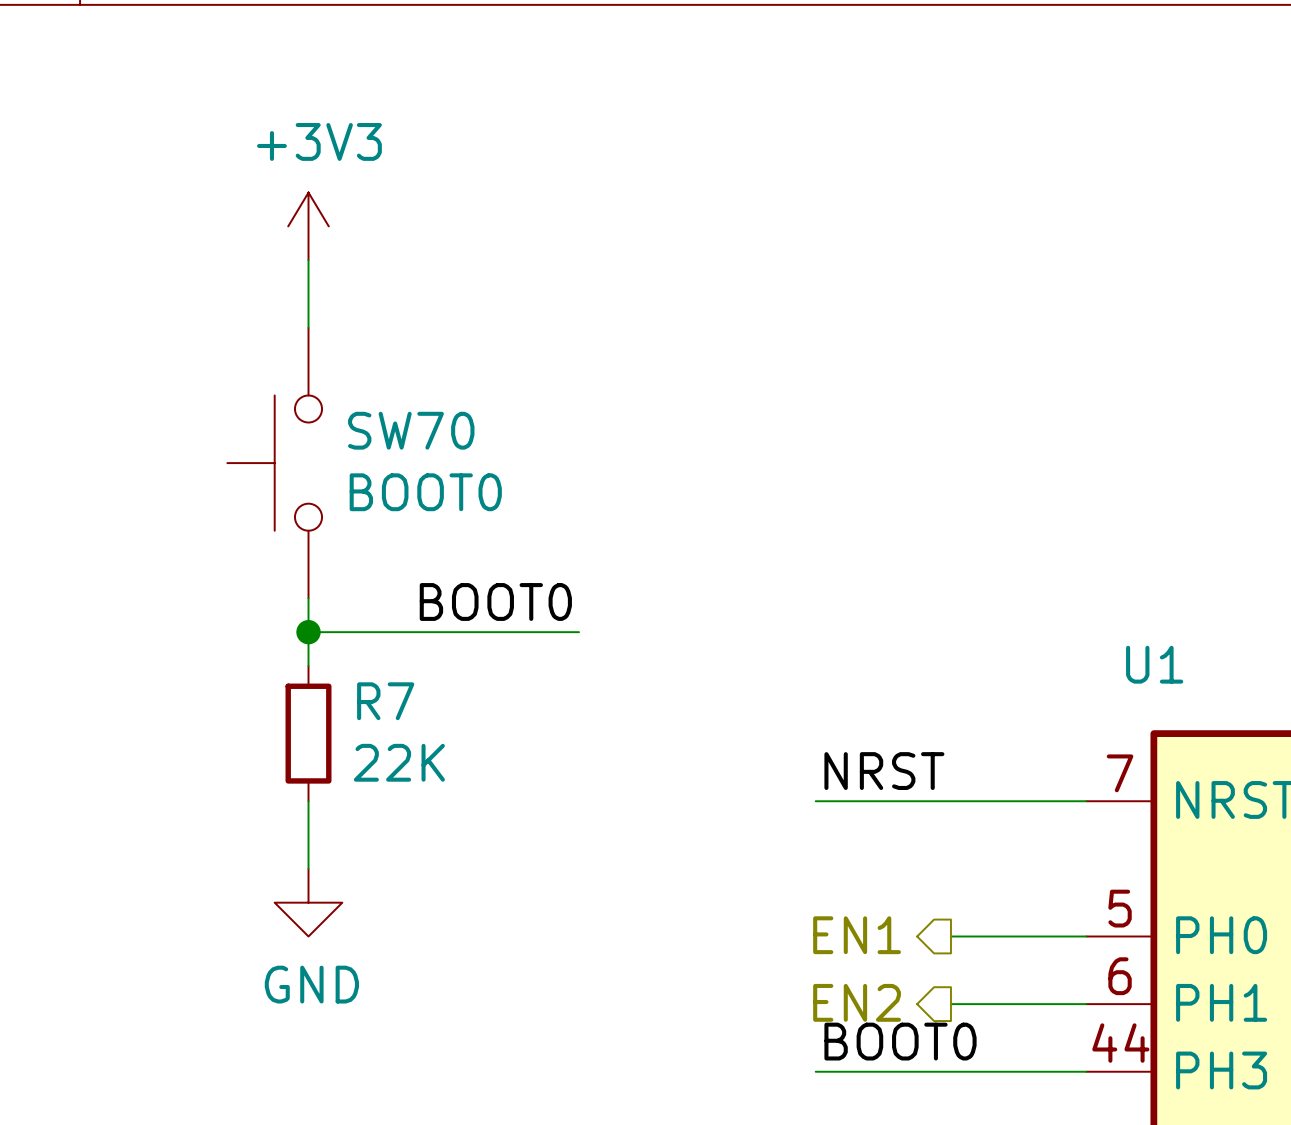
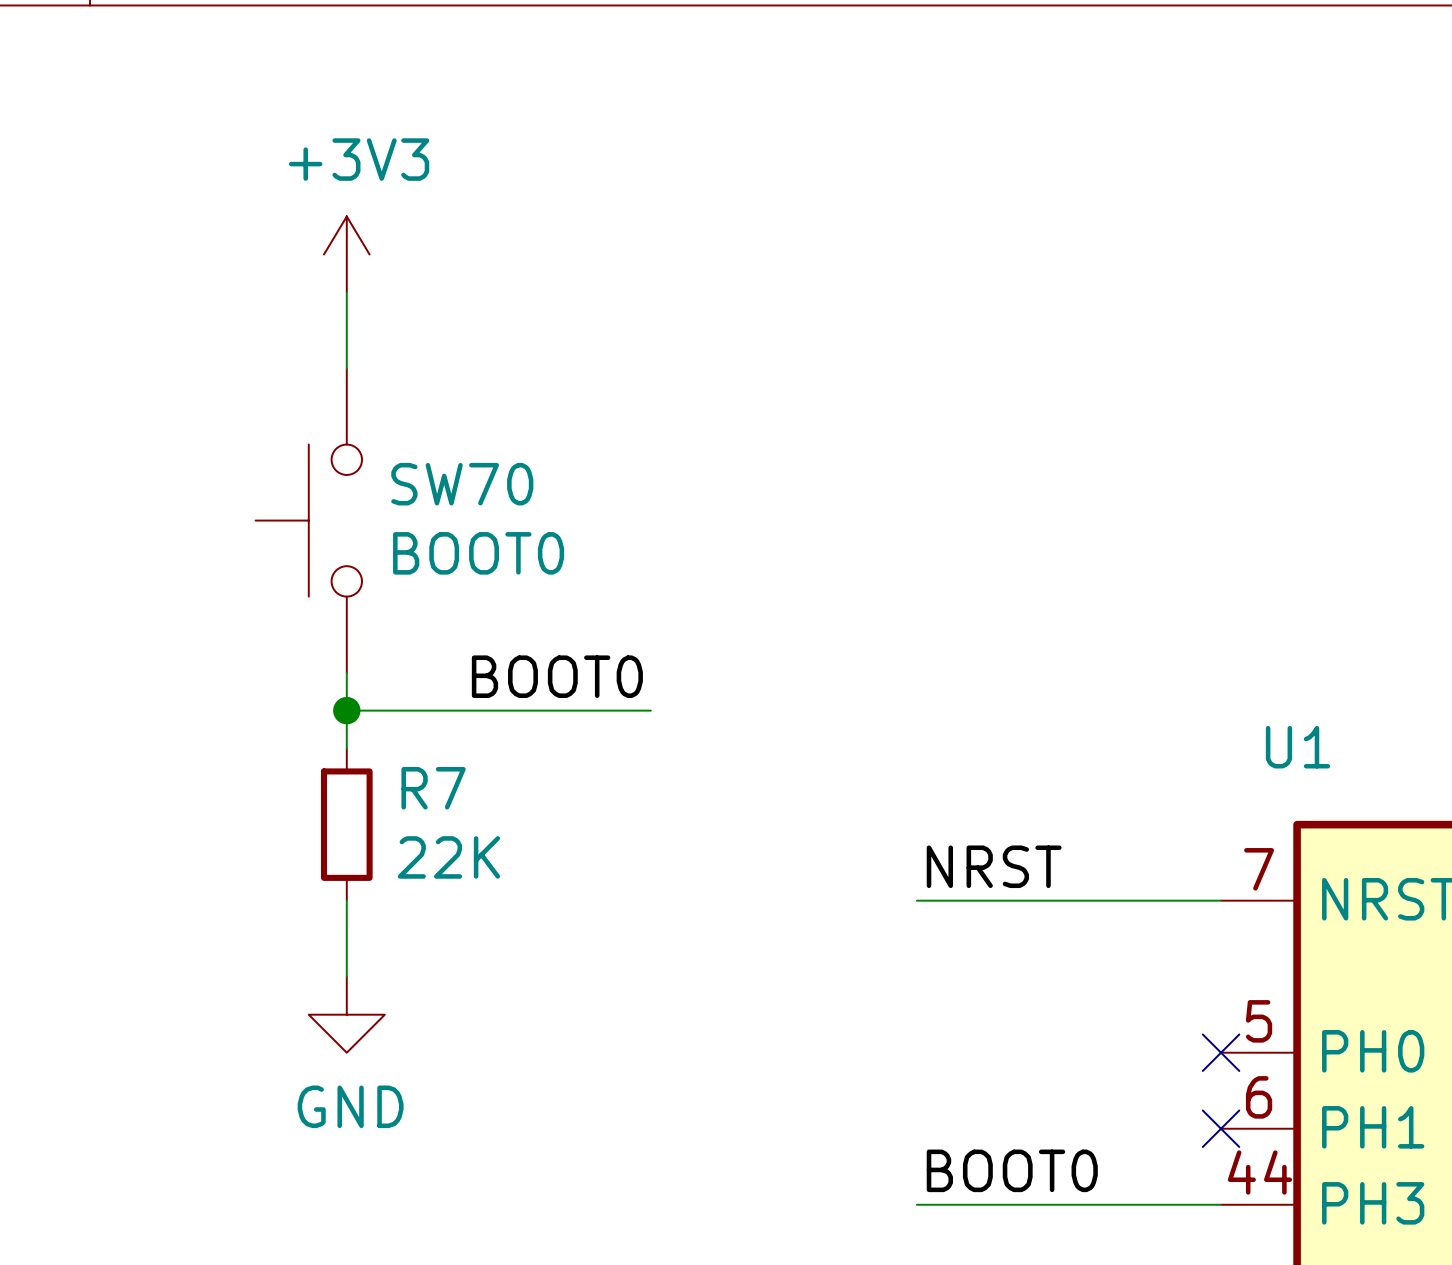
hierarchical label: EN1 (857, 935) -> none
wire: (950, 936) (1086, 936) -> none
no-connect mark: none -> (1221, 1052)
hierarchical label: EN2 (857, 1002) -> none
wire: (950, 1004) (1086, 1004) -> none
no-connect mark: none -> (1221, 1128)

